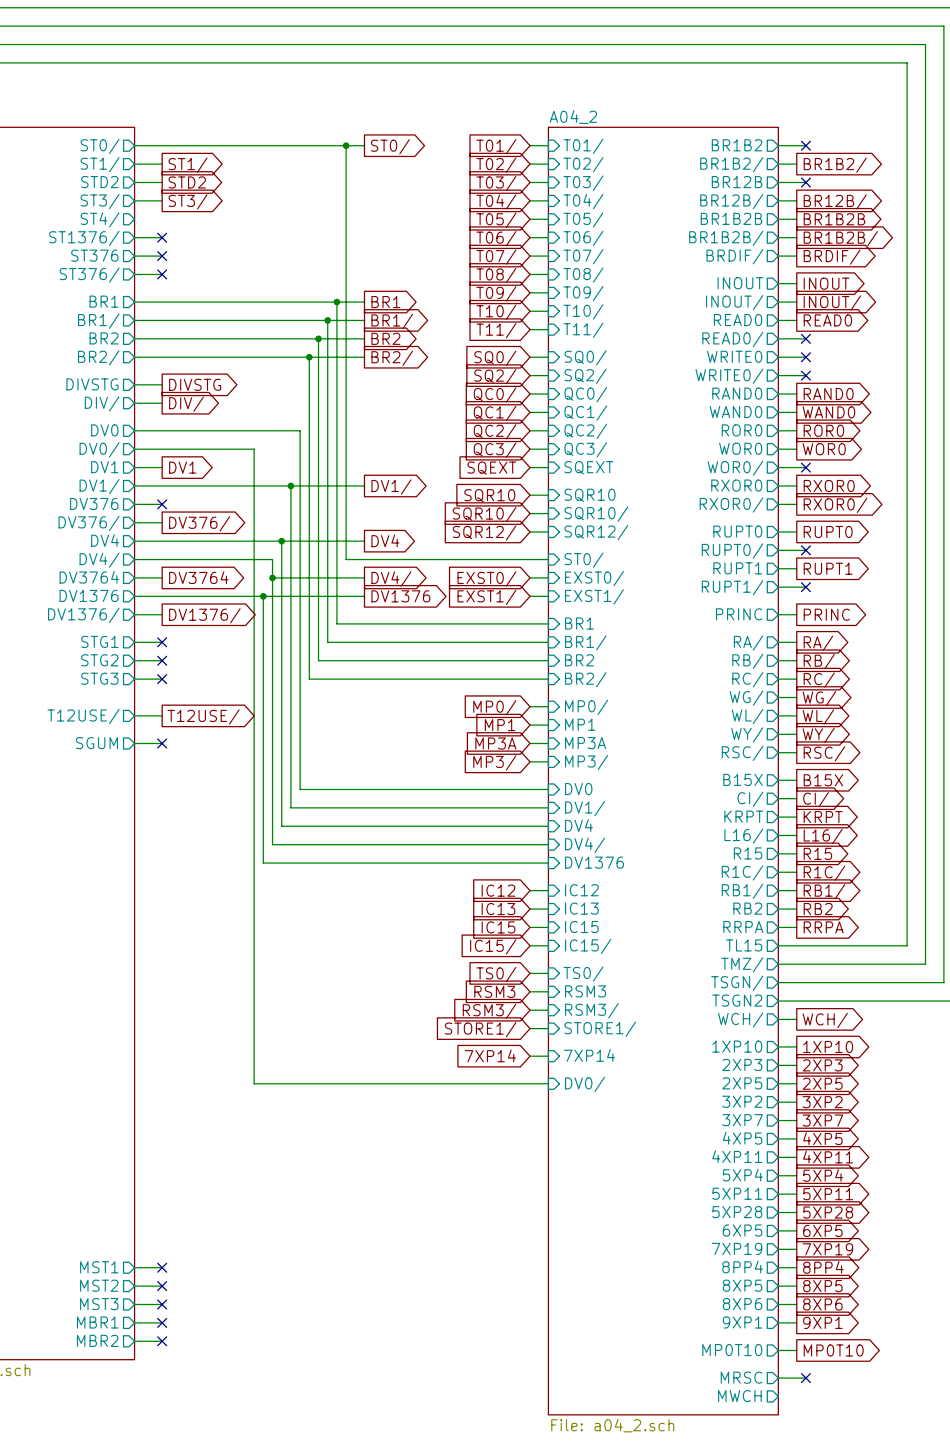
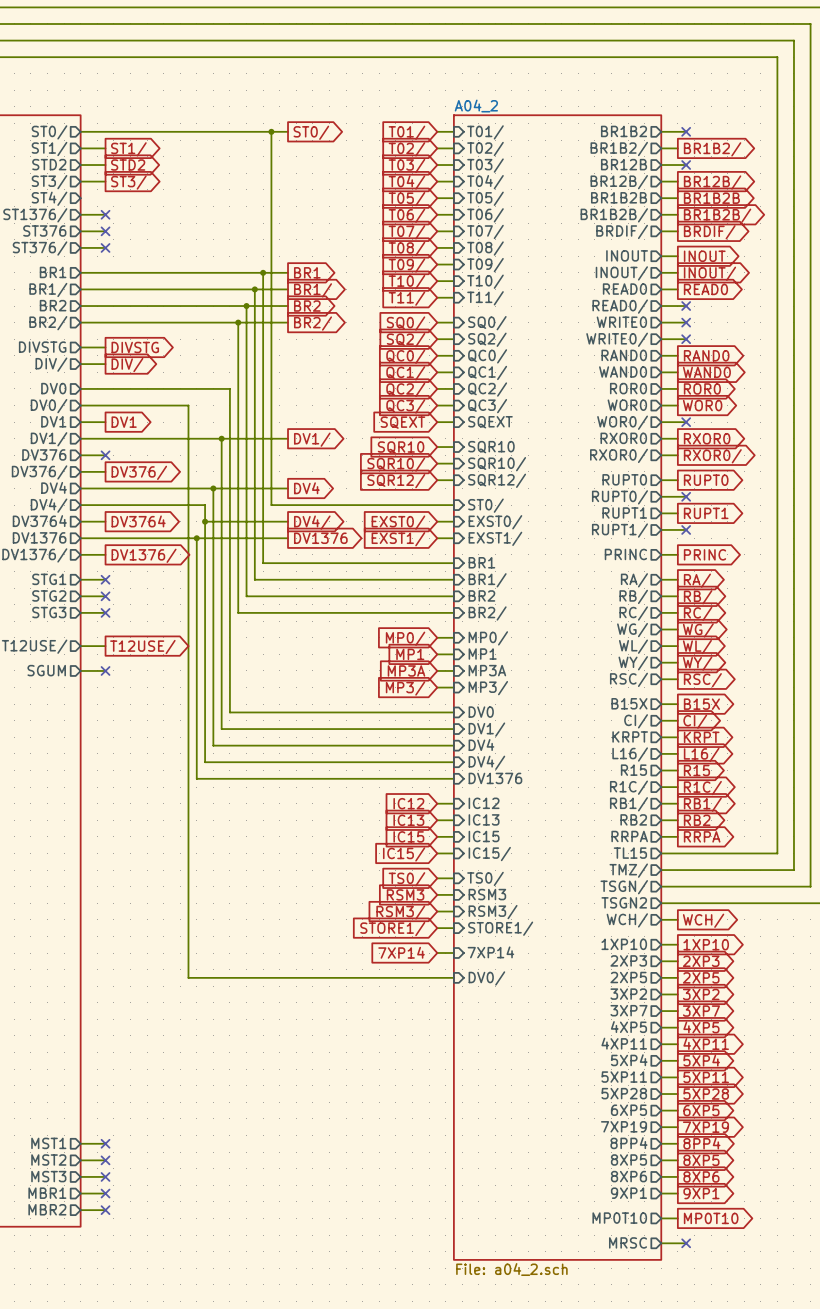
sheet A04_2 shape: [548, 127, 779, 1415] -> [453, 115, 662, 1260]
sheet pin: MWCH (739, 1396) -> none

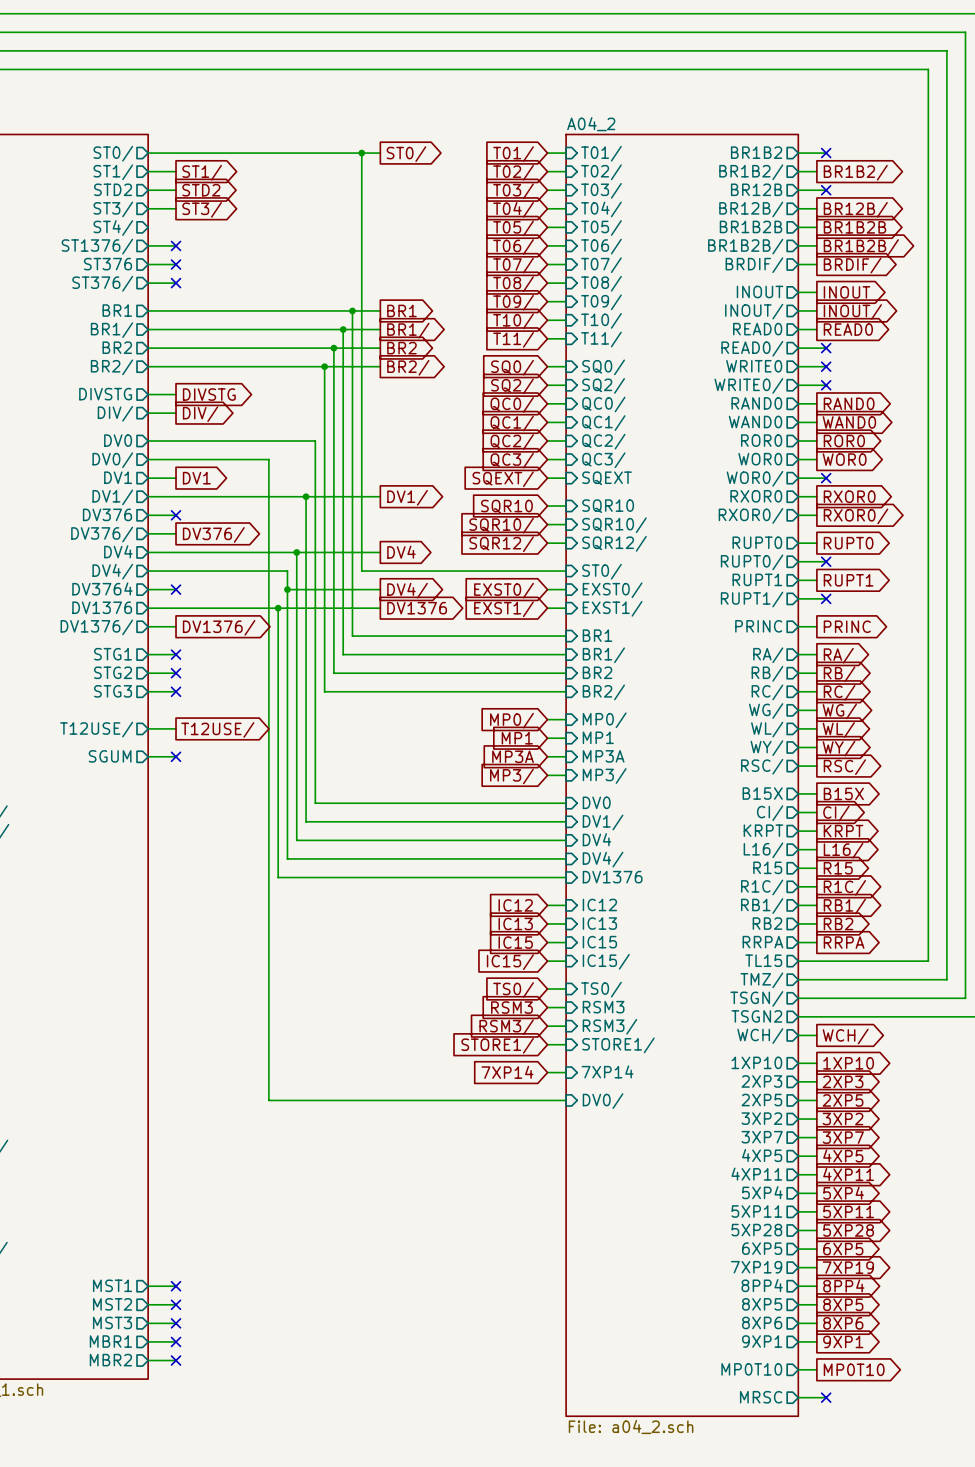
global label: SQEXT (402, 422) -> SQEXT/ (503, 479)
no-connect mark: none -> (176, 589)
global label: DV3764 (138, 521) -> none

